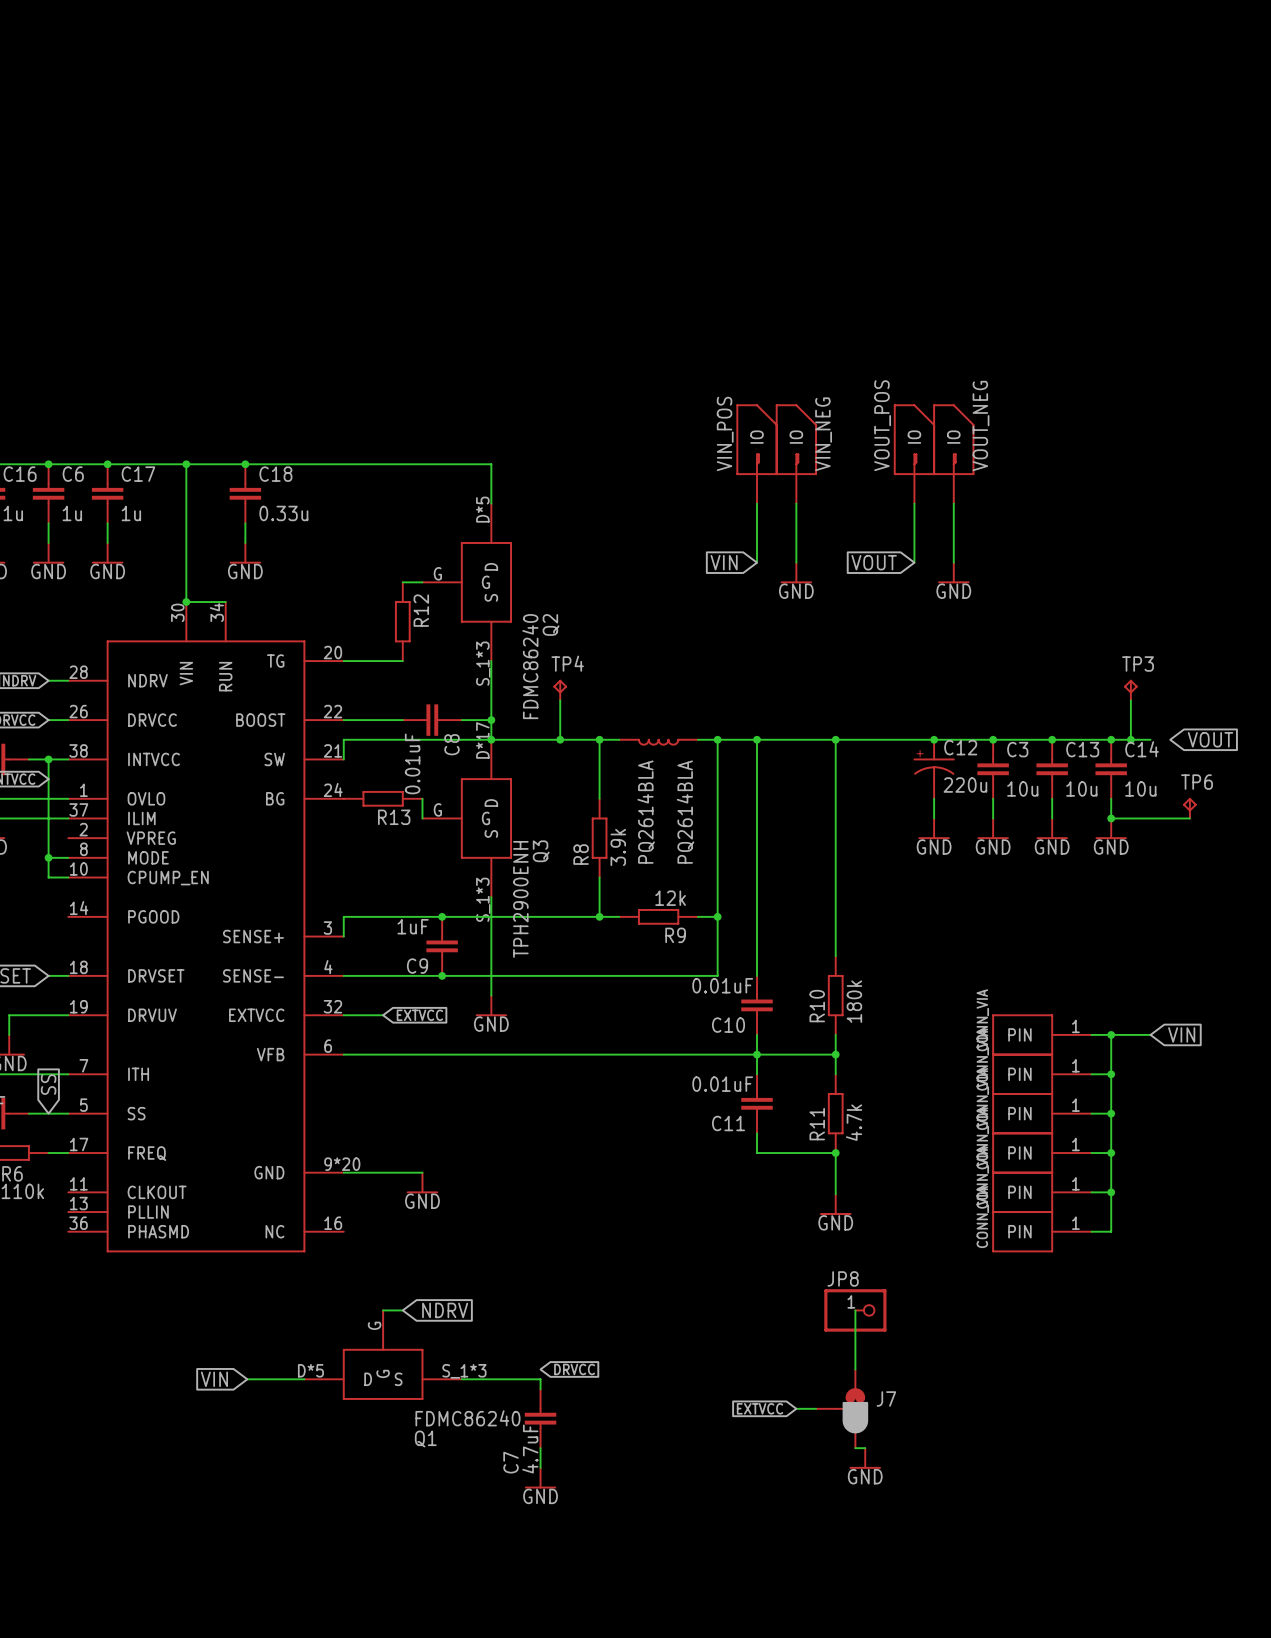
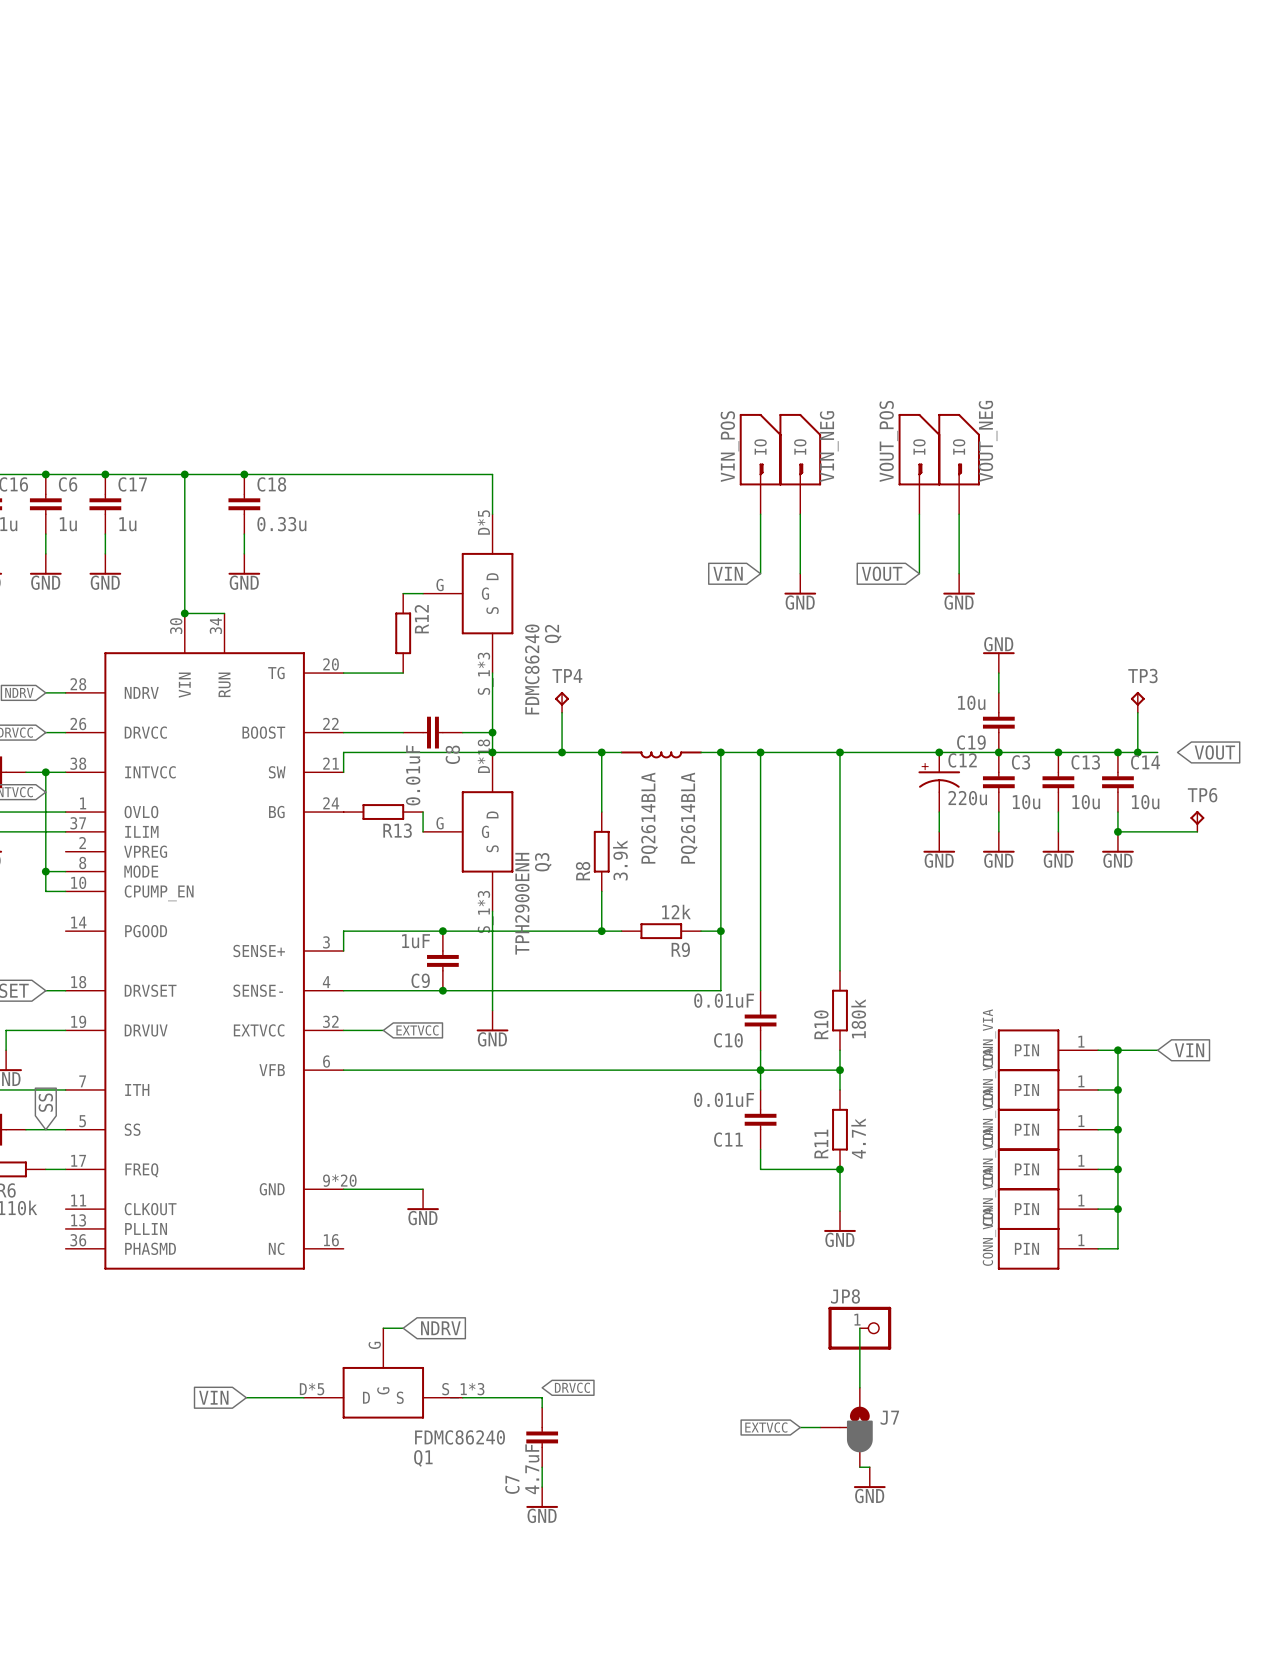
power symbol: none -> GND (998, 662)
wire: none -> (998, 673) (998, 692)
C19: none -> 10u (998, 722)
Q3 pin number: D*17 (482, 740) -> D*18 (483, 756)

